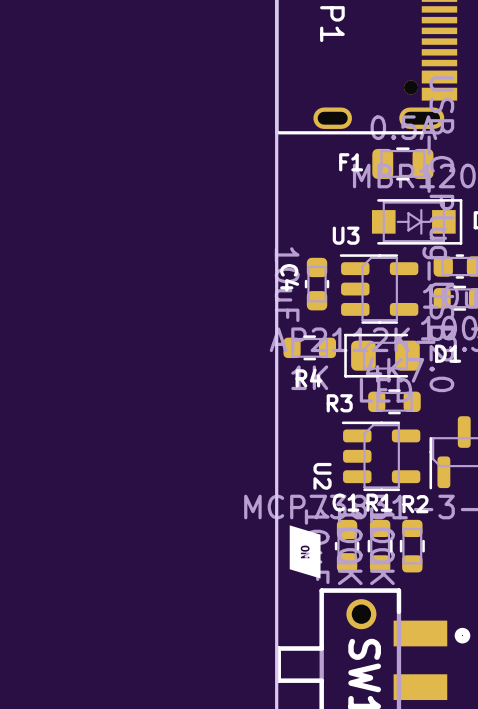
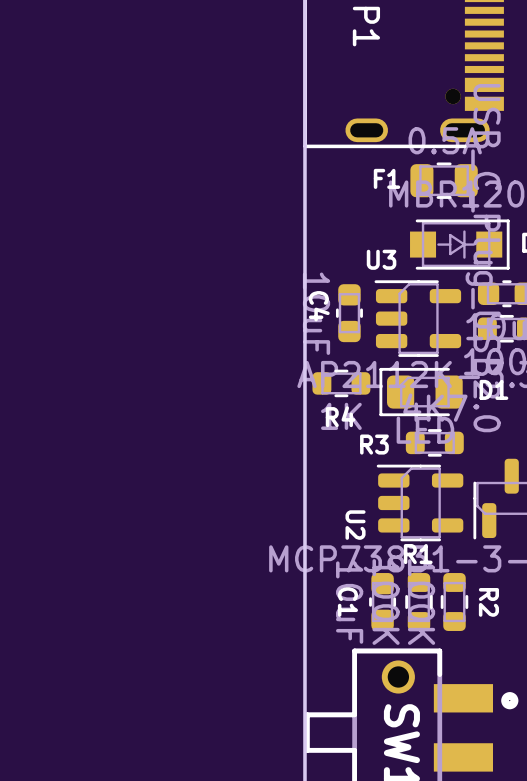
C1 name rotation: 0° (345, 502) -> 90° clockwise (347, 602)
C1 name position: C1 (345, 502) -> C1 (347, 602)
R2 name rotation: 0° (415, 504) -> 90° clockwise (488, 602)
R2 name position: R2 (415, 504) -> R2 (488, 602)
drawing: [289, 525, 321, 579] -> none

